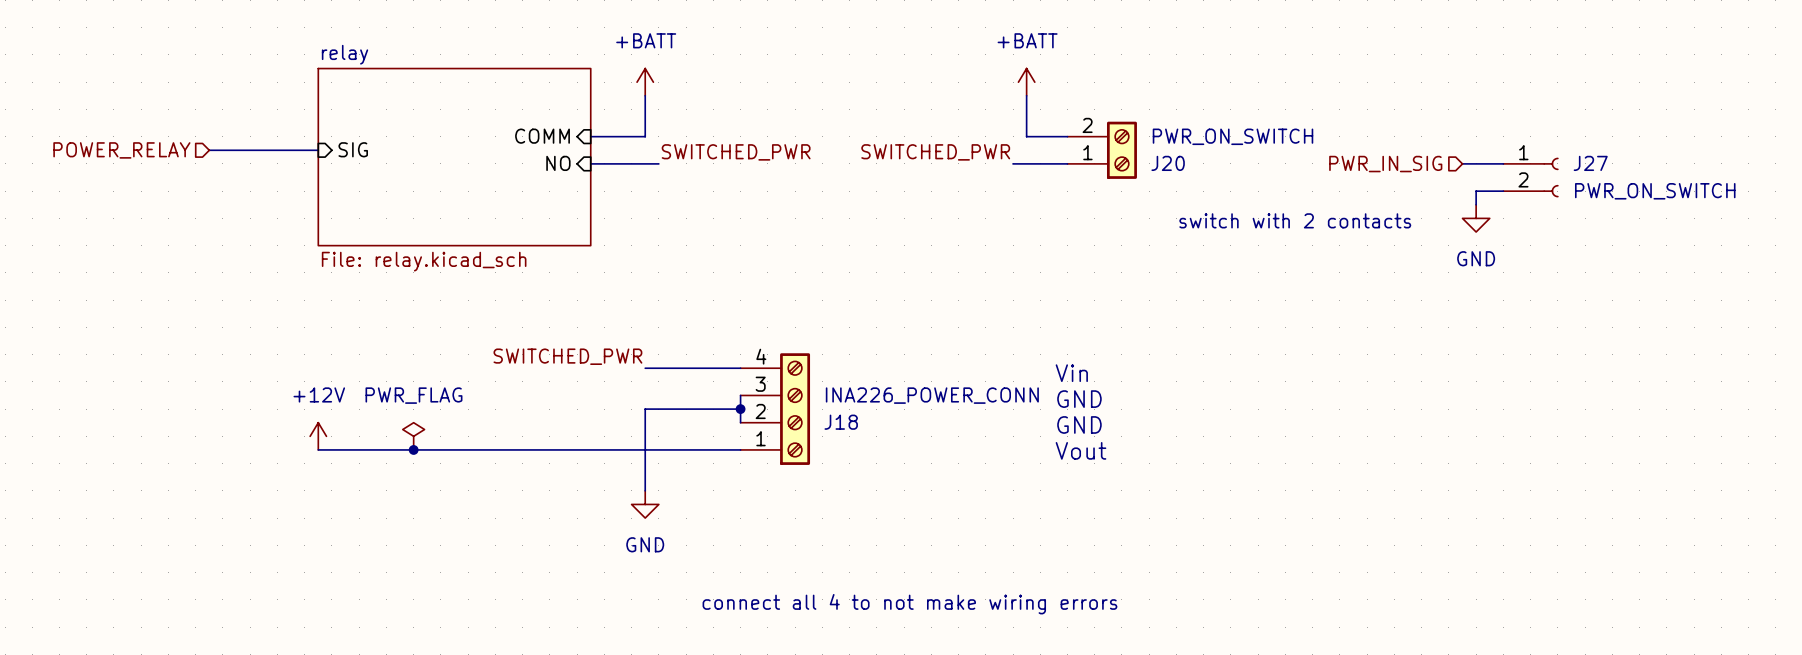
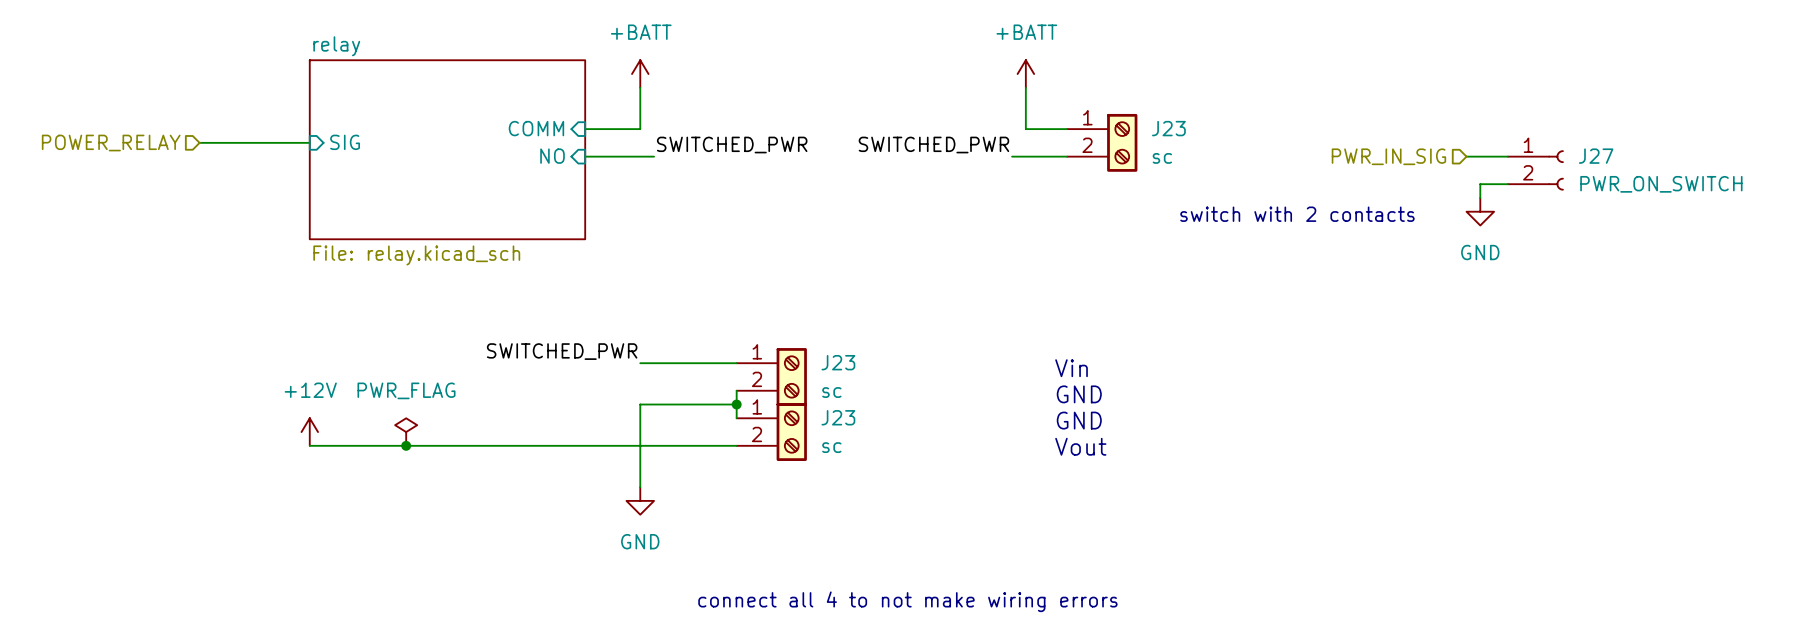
J20: PWR_ON_SWITCH (1102, 150) -> none
J23: none -> sc (1102, 142)
J23: none -> sc (771, 376)
J18: INA226_POWER_CONN (775, 409) -> none
J23: none -> sc (771, 432)

